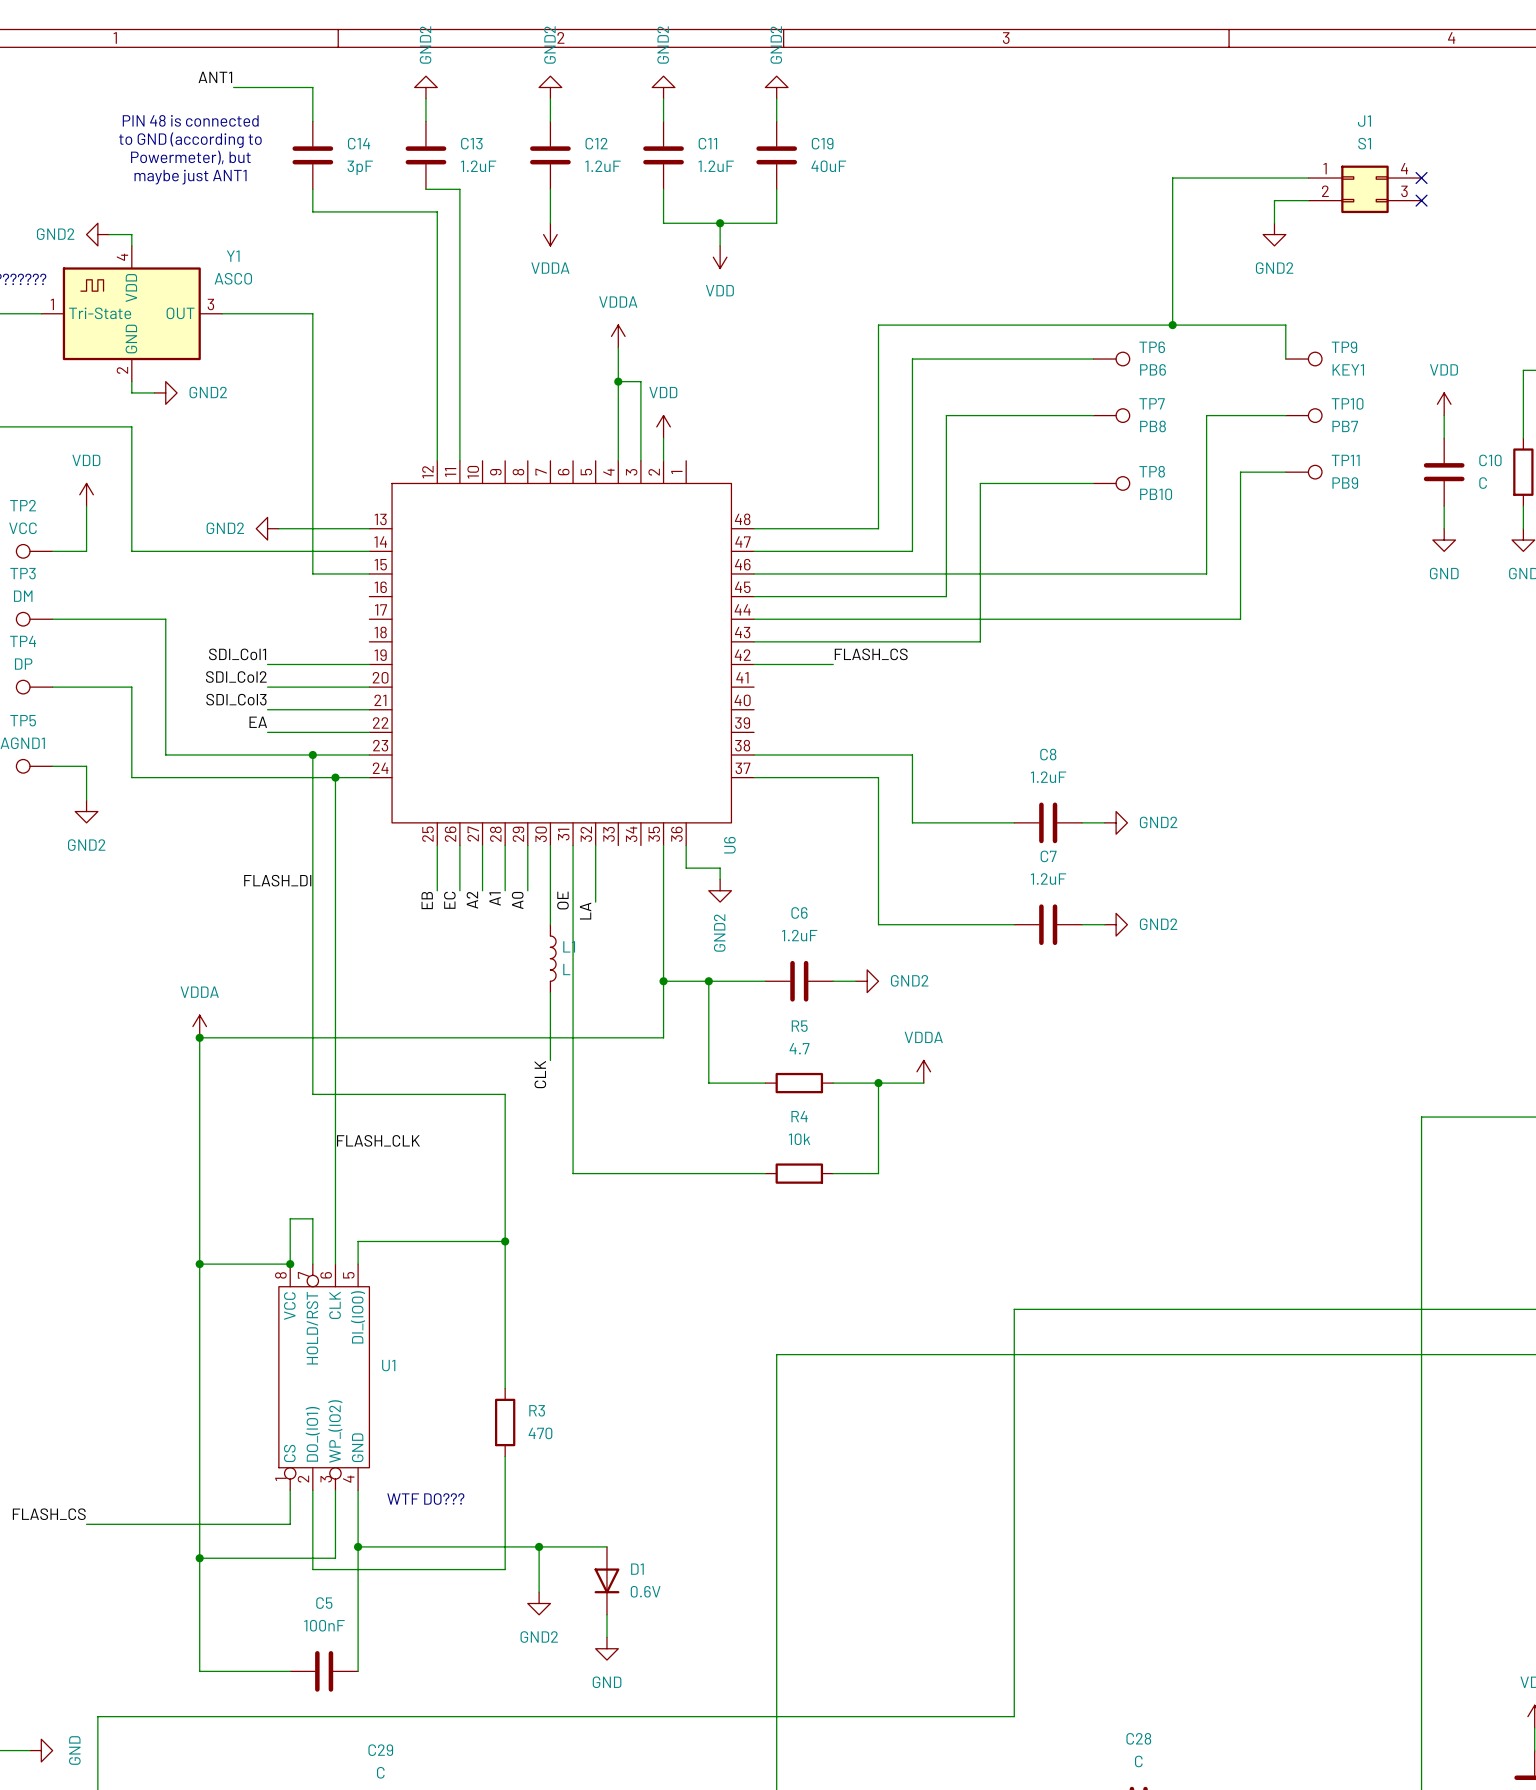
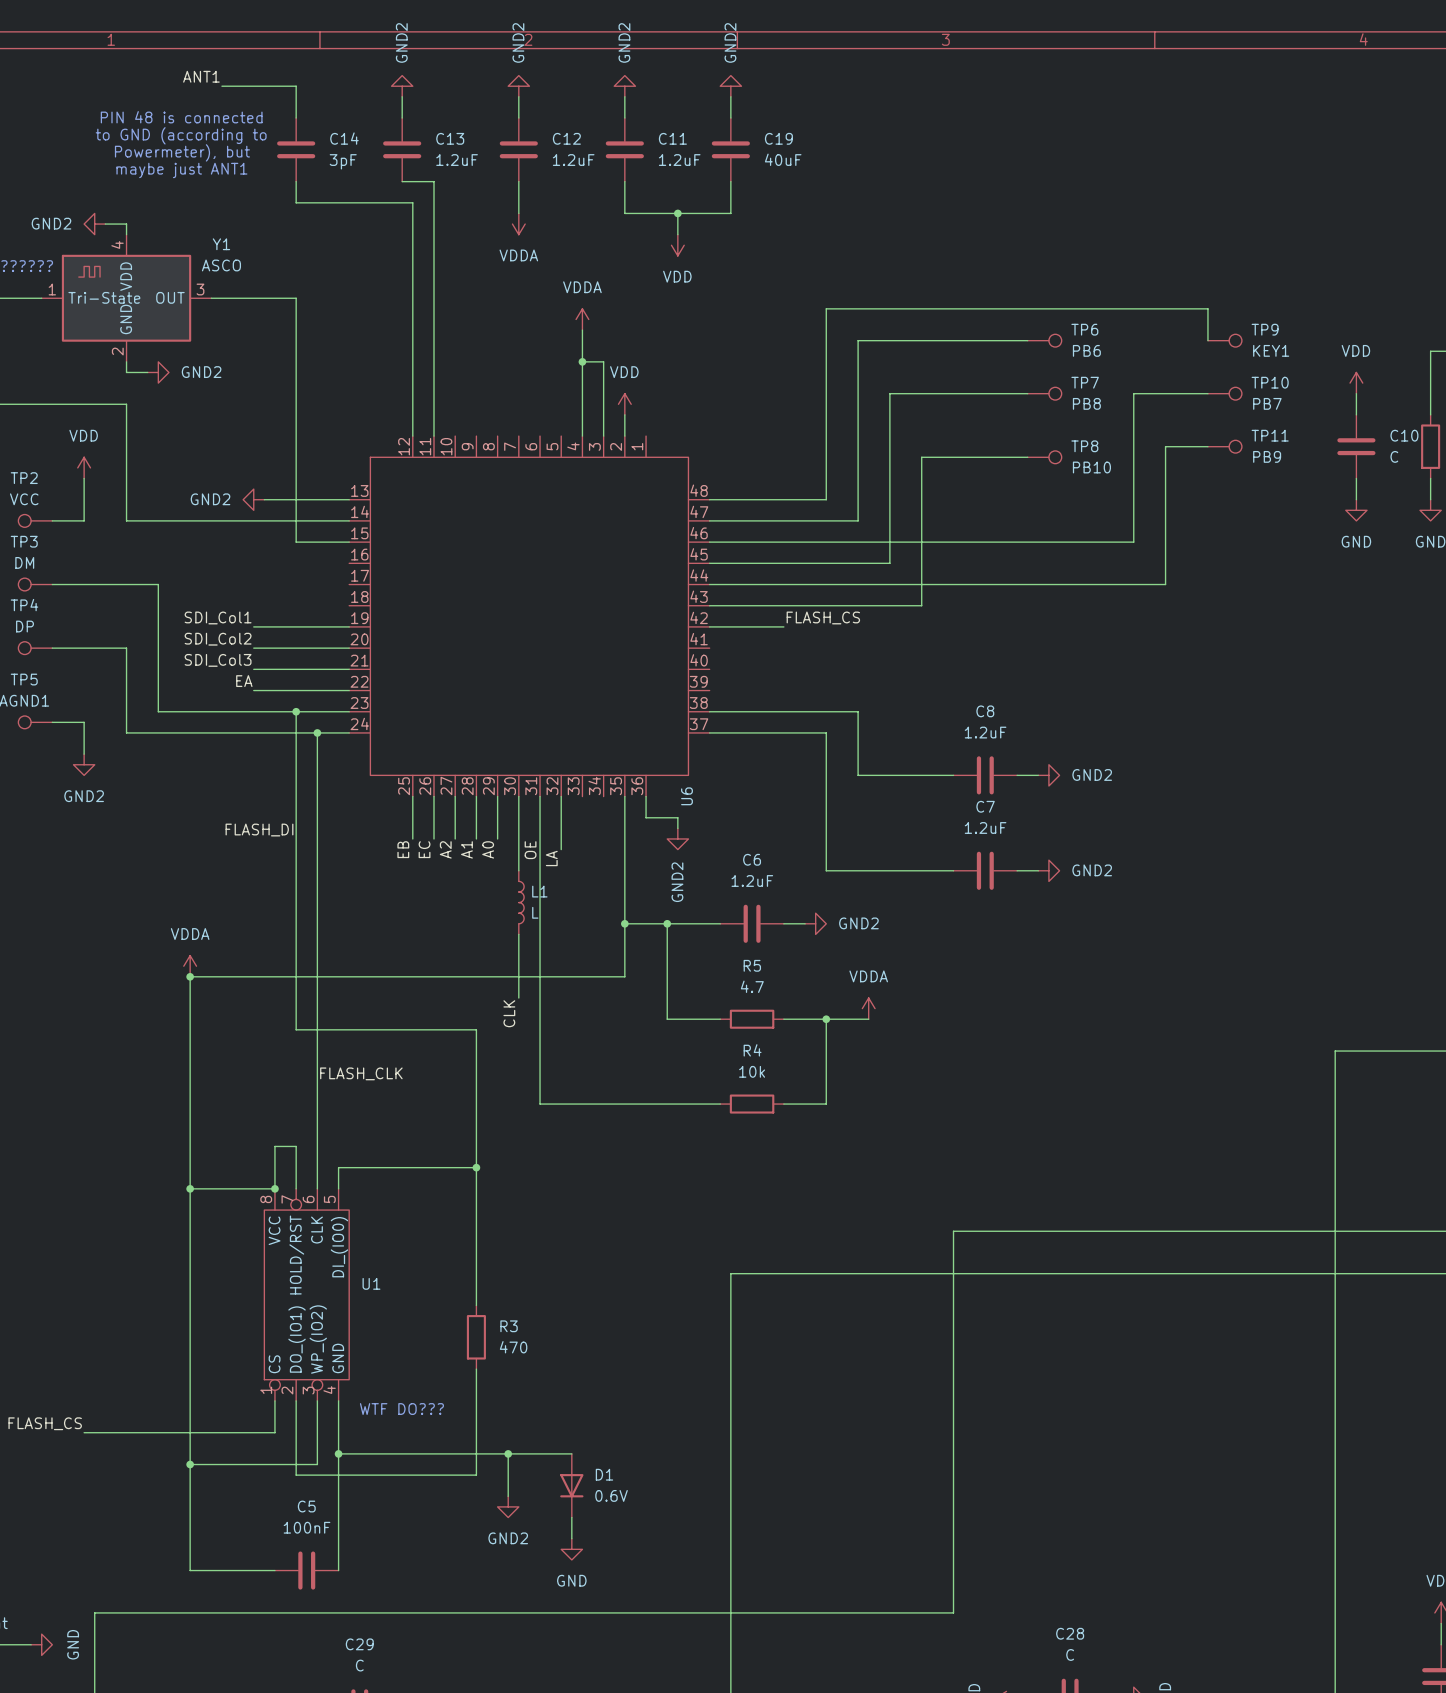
wire: (1308, 178) (1172, 178) (1172, 325) -> none
no-connect mark: (1421, 178) -> none
J1: S1 (1364, 189) -> none
wire: (1308, 200) (1274, 200) (1274, 223) -> none
no-connect mark: (1421, 200) -> none
power symbol: GND2 (1274, 234) -> none
junction: (1172, 325) -> none

